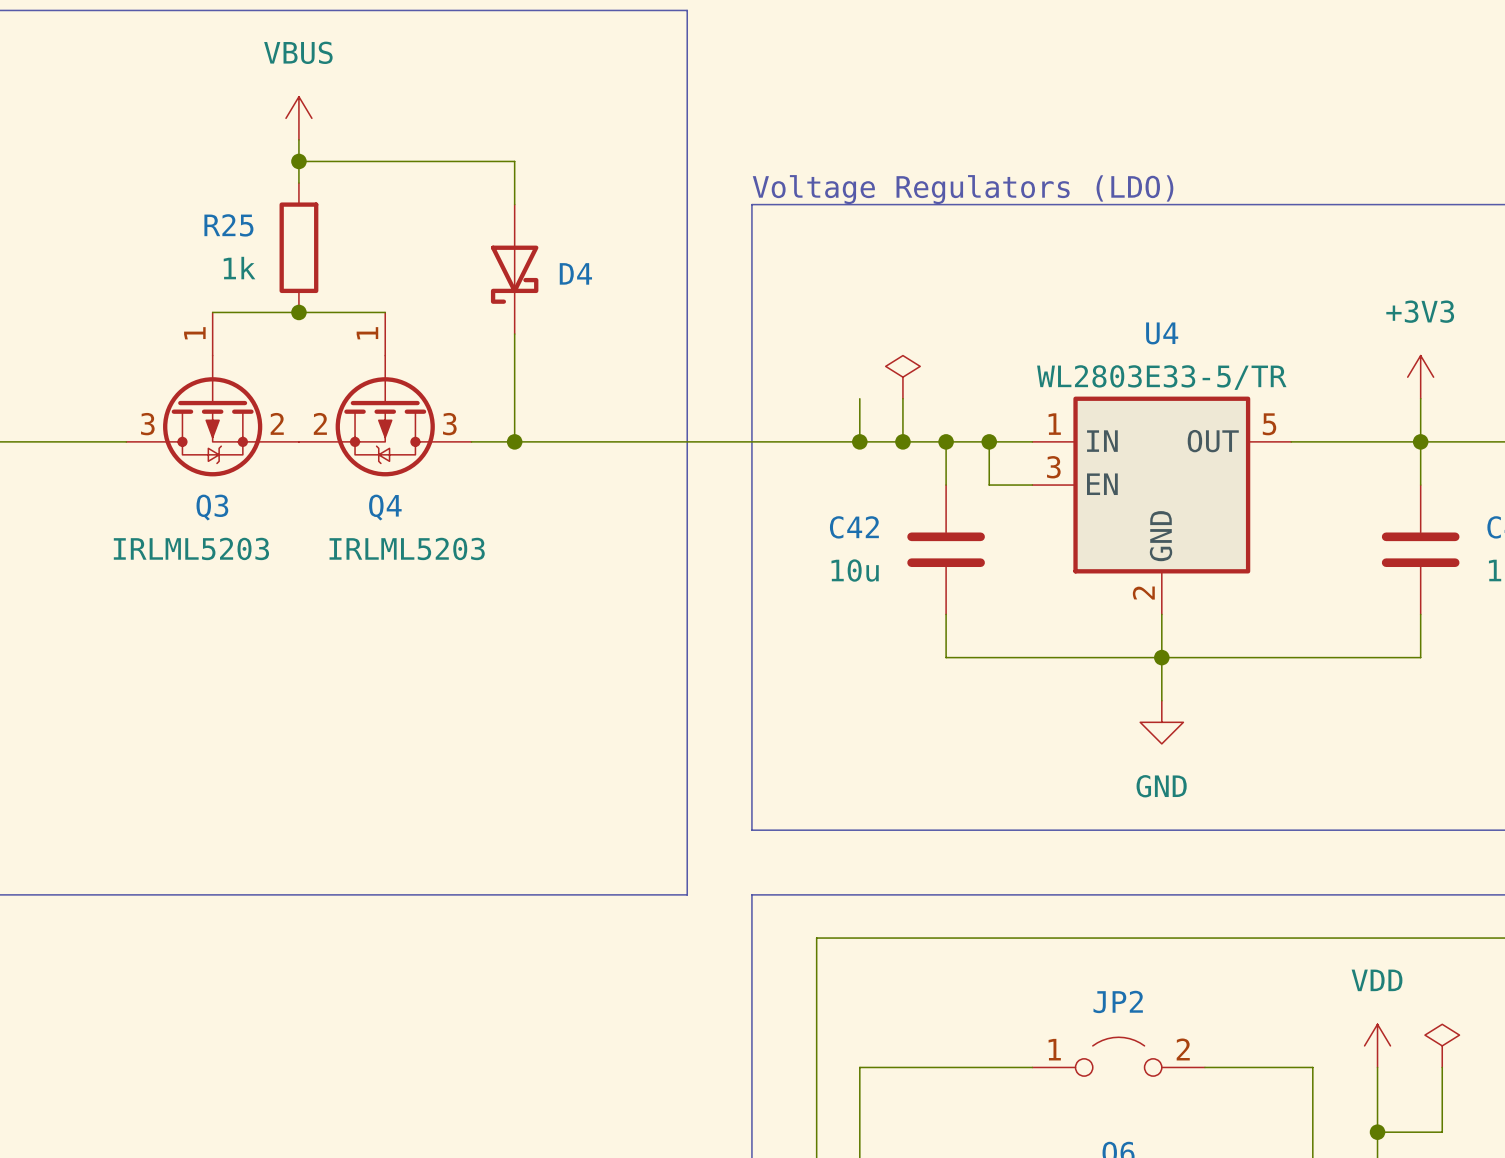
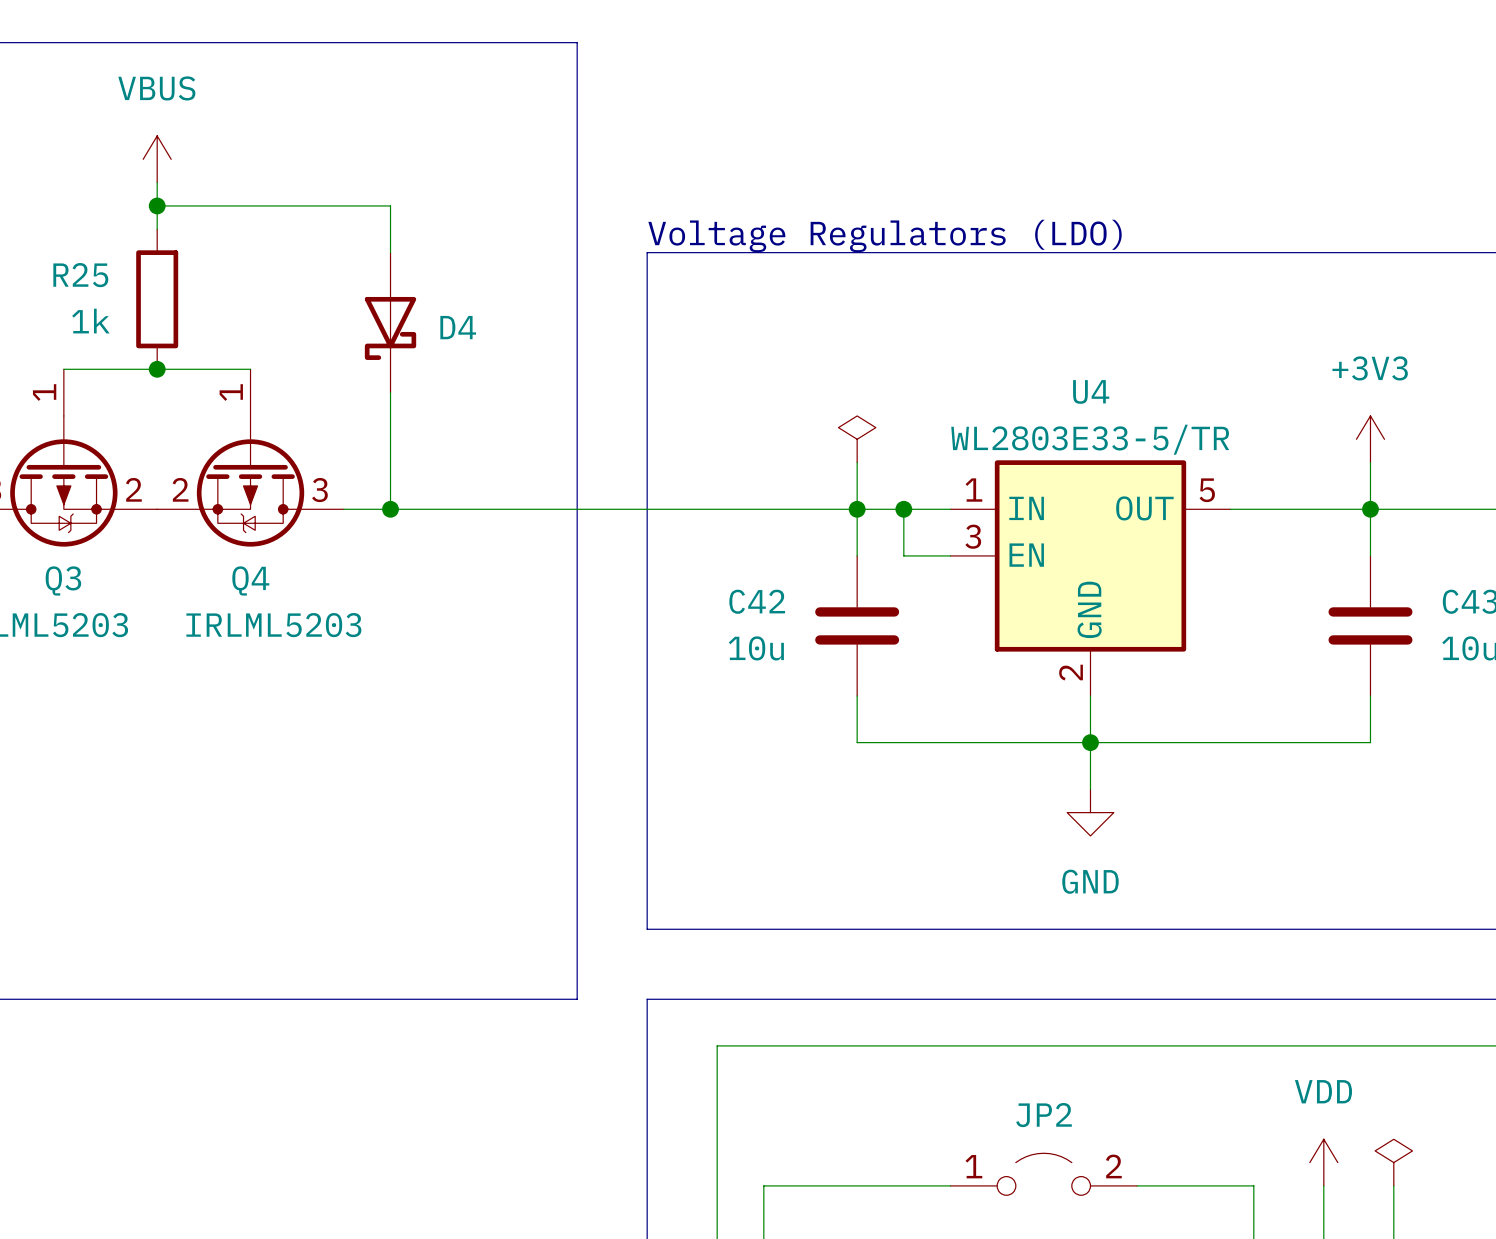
power symbol position: (902, 377) -> (857, 439)
wire: (859, 398) (859, 441) -> none
wire: (902, 398) (902, 441) -> (857, 462) (857, 509)
junction: (859, 441) -> none
junction: (902, 441) -> none

